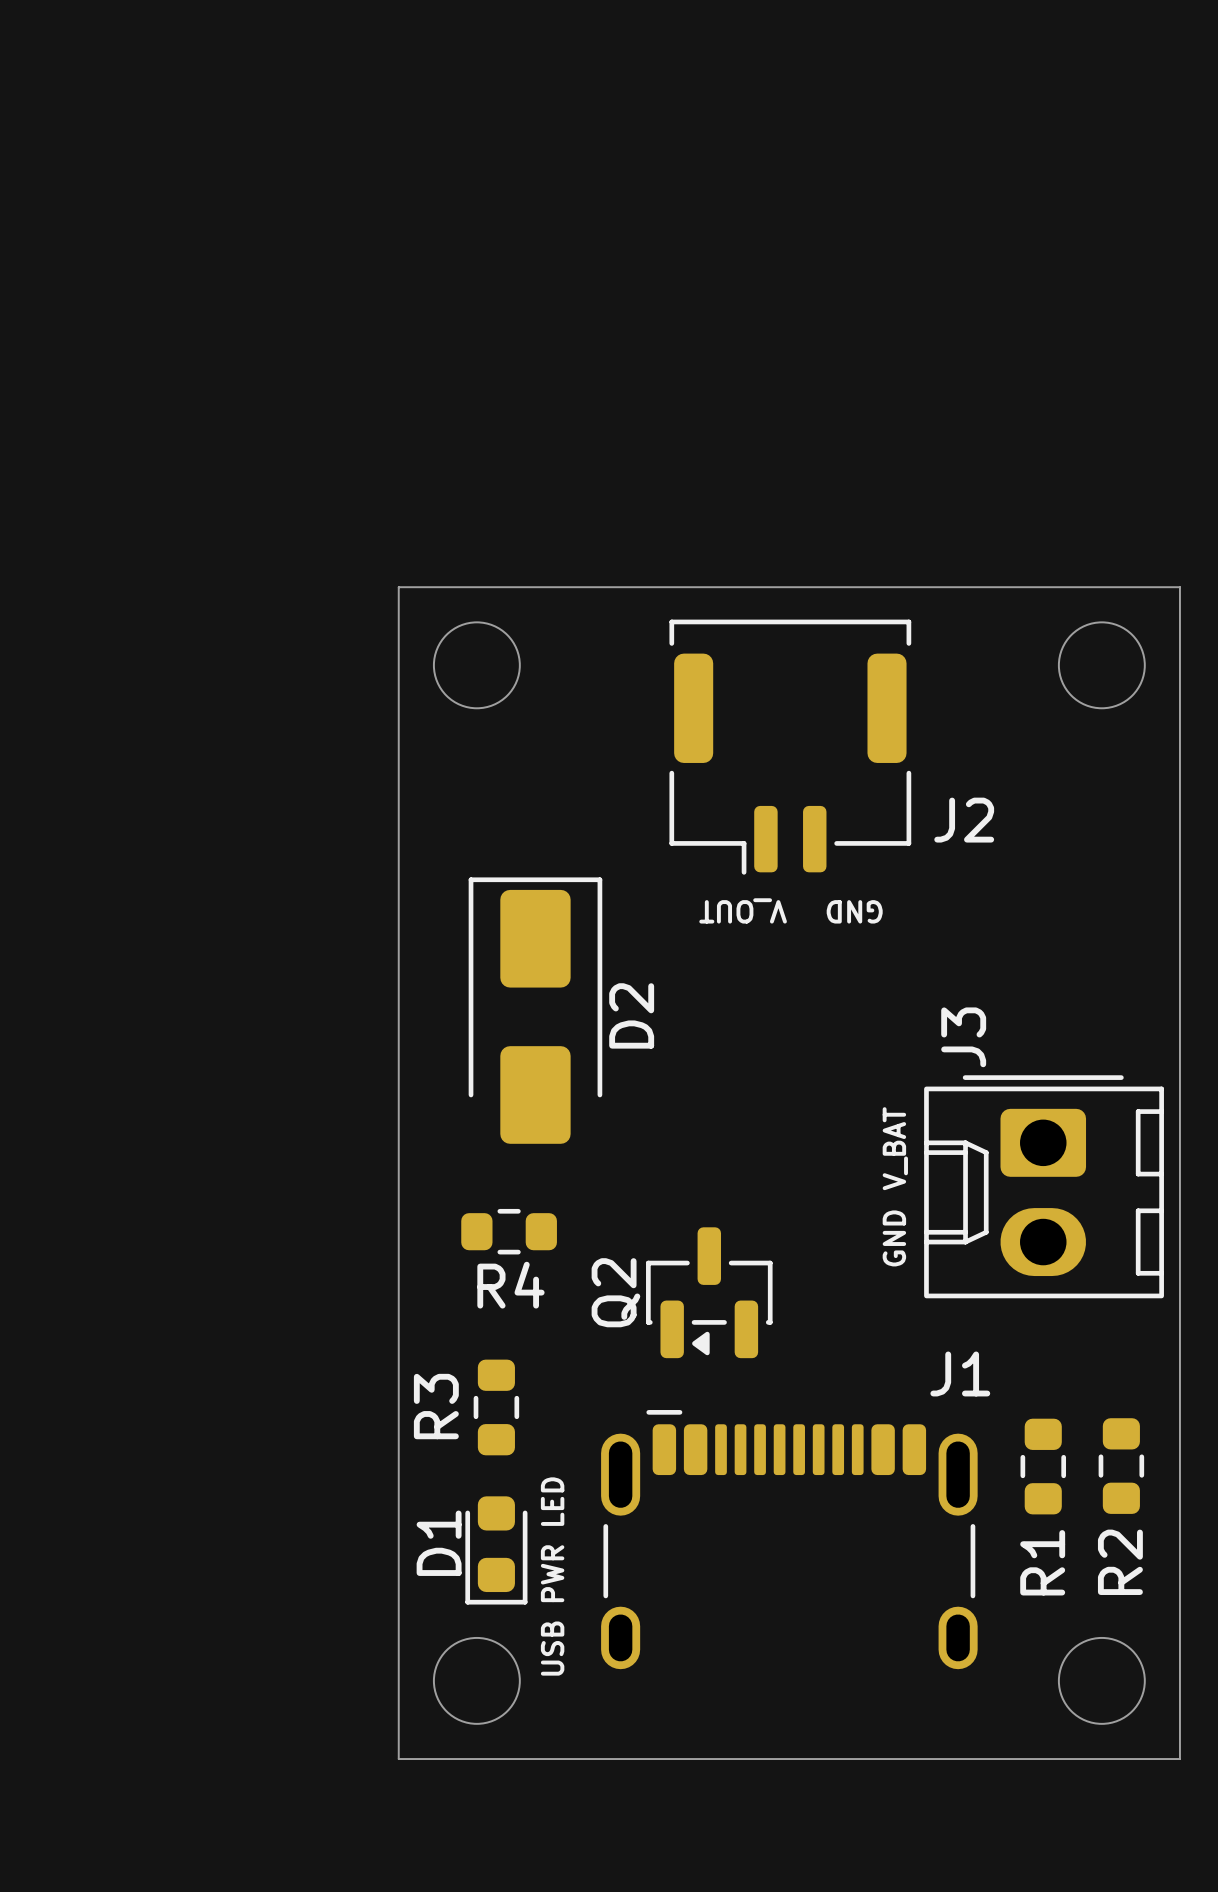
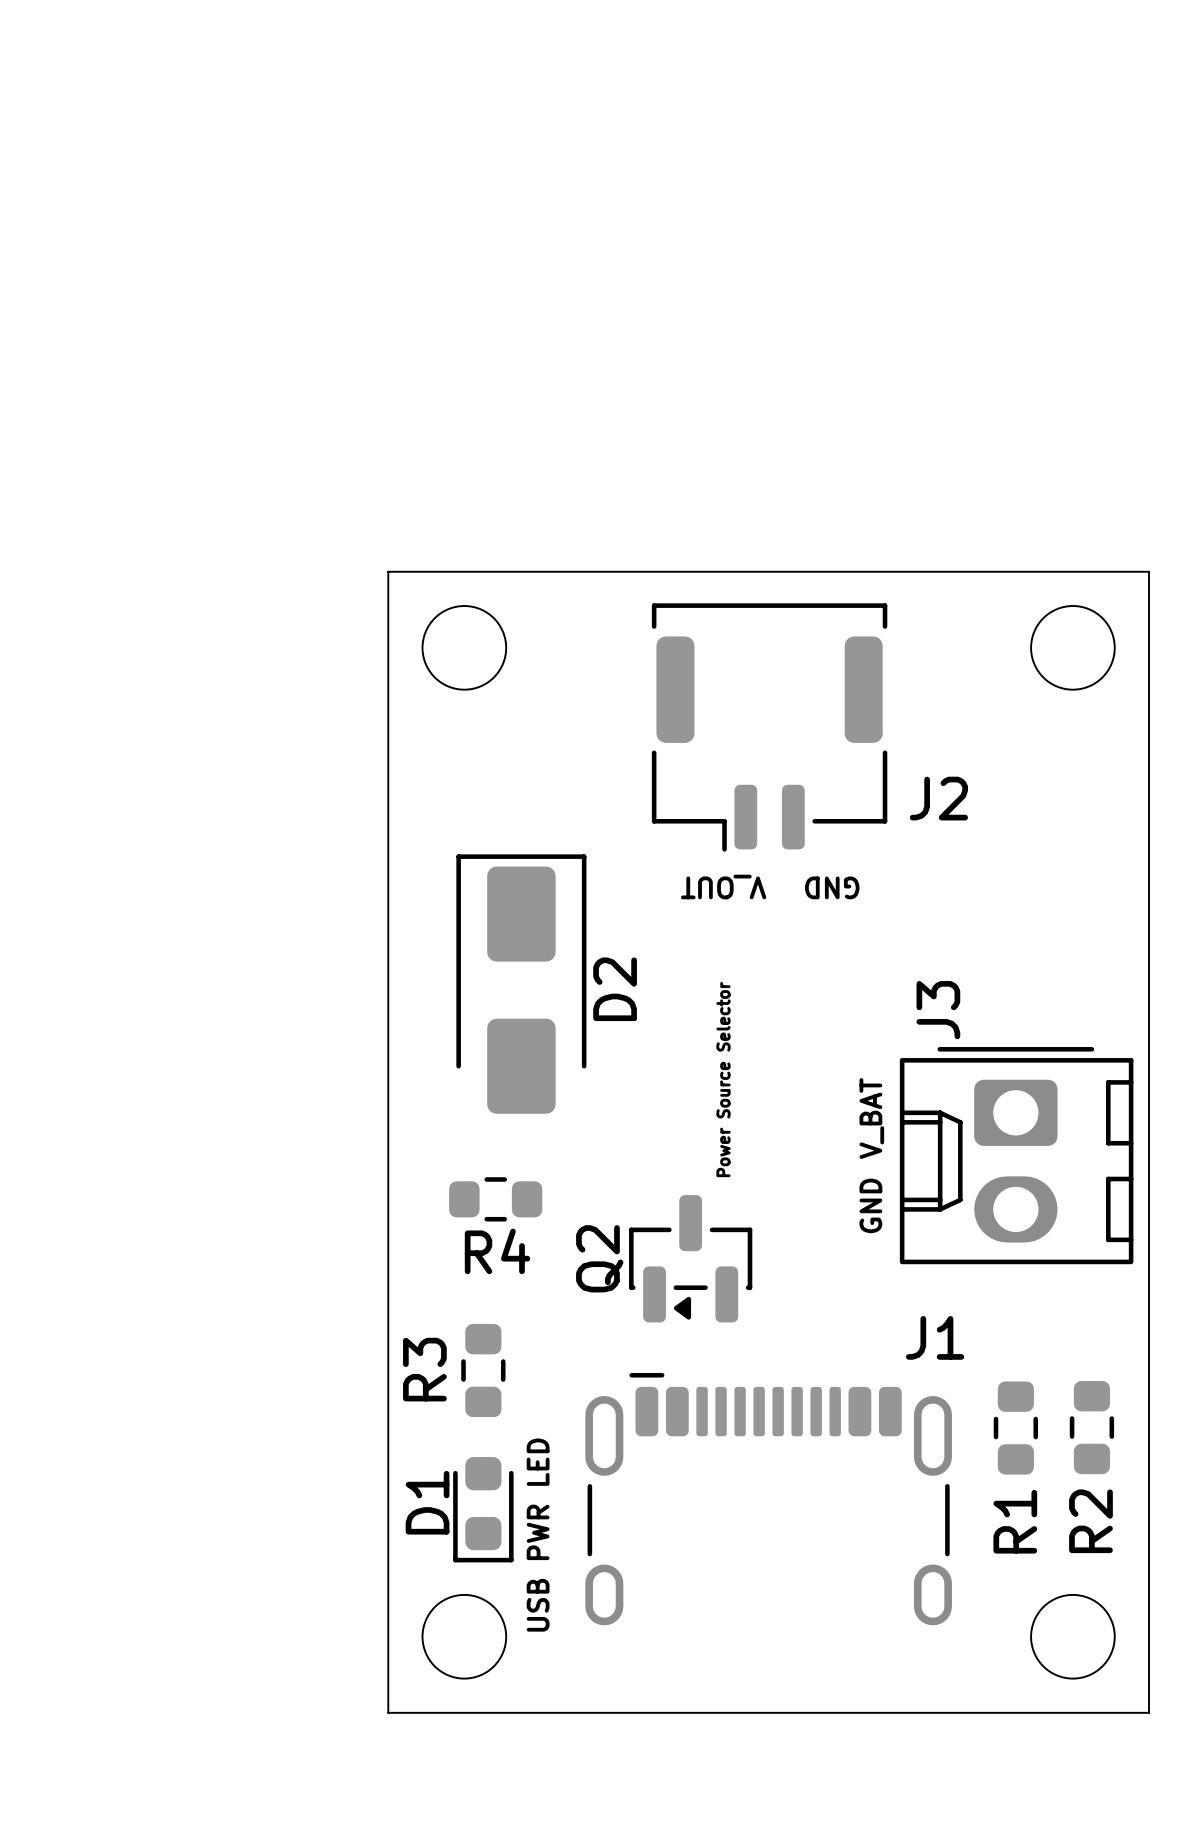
text: none -> Power Source Selector (723, 1079)

